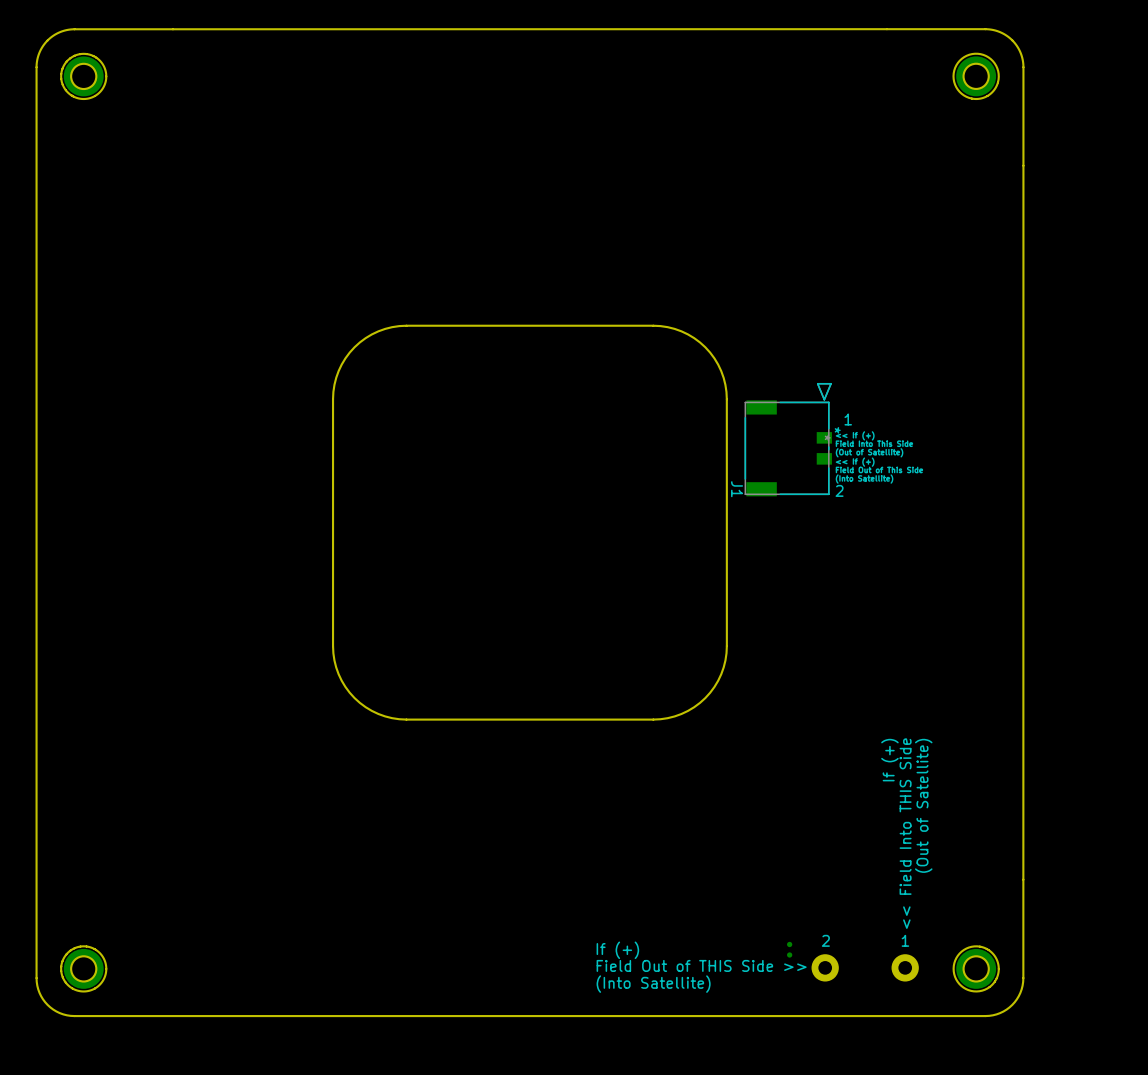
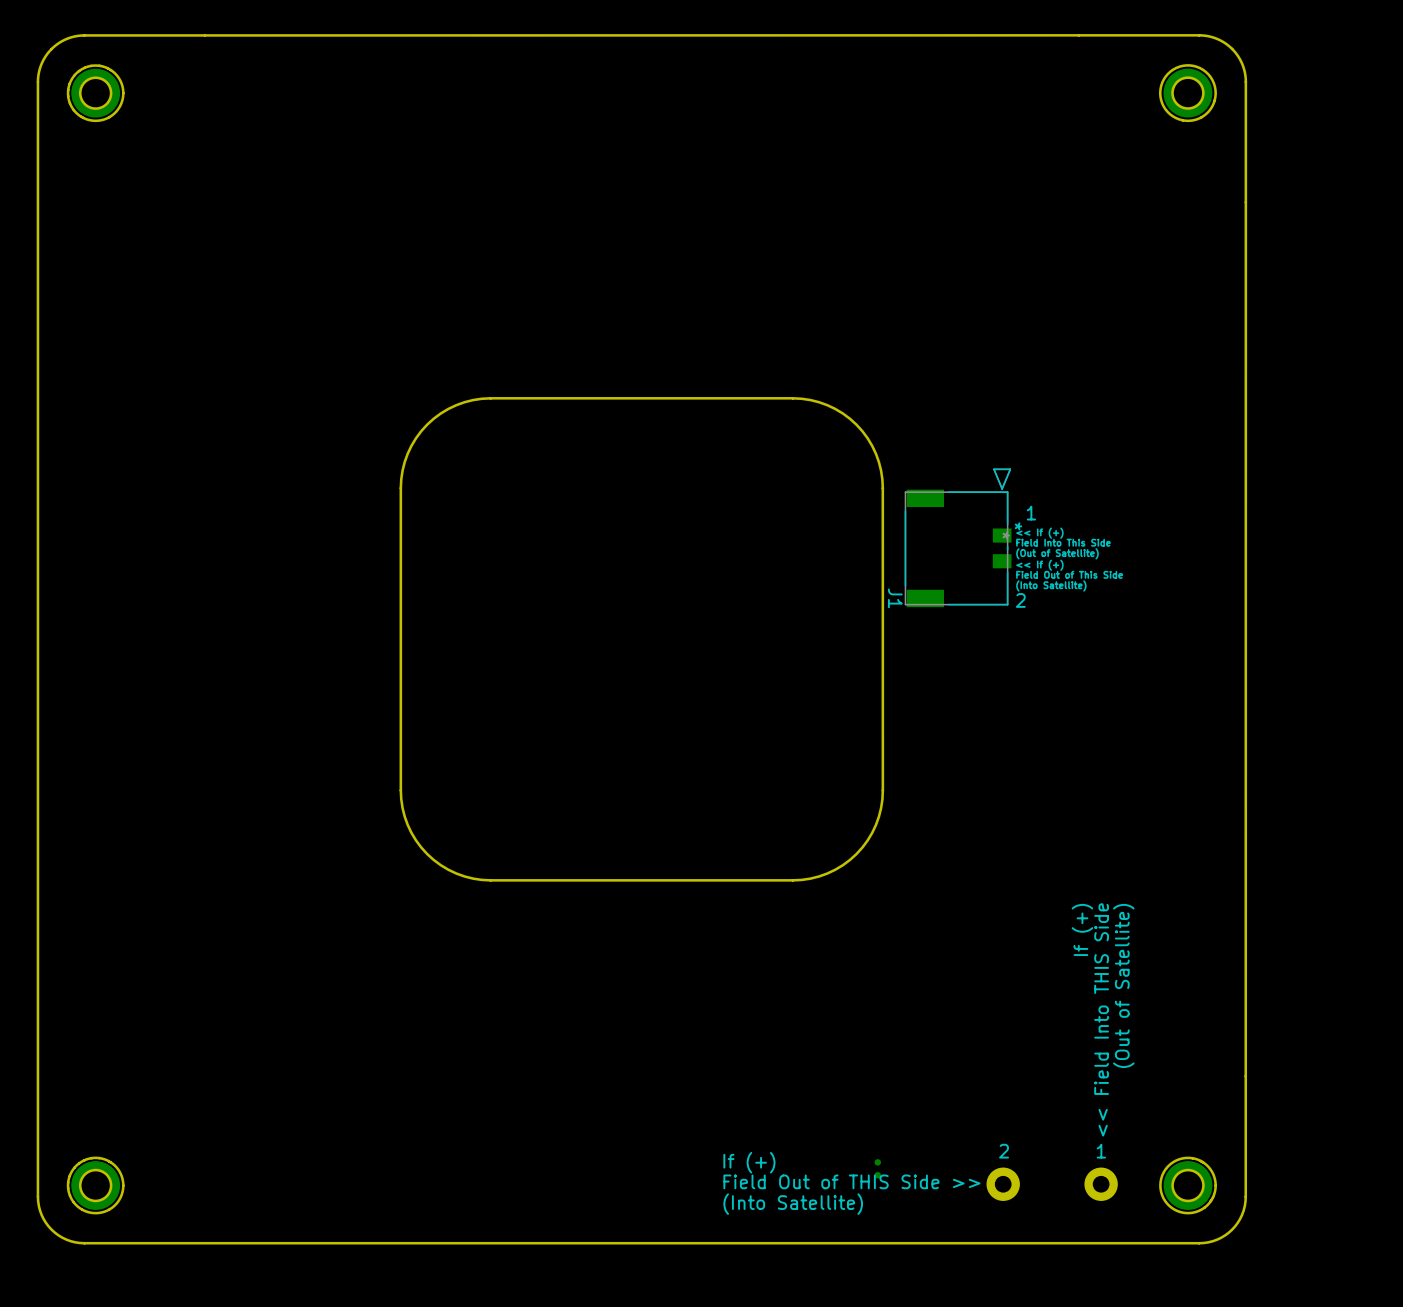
part position: (789, 949) -> (877, 1168)

